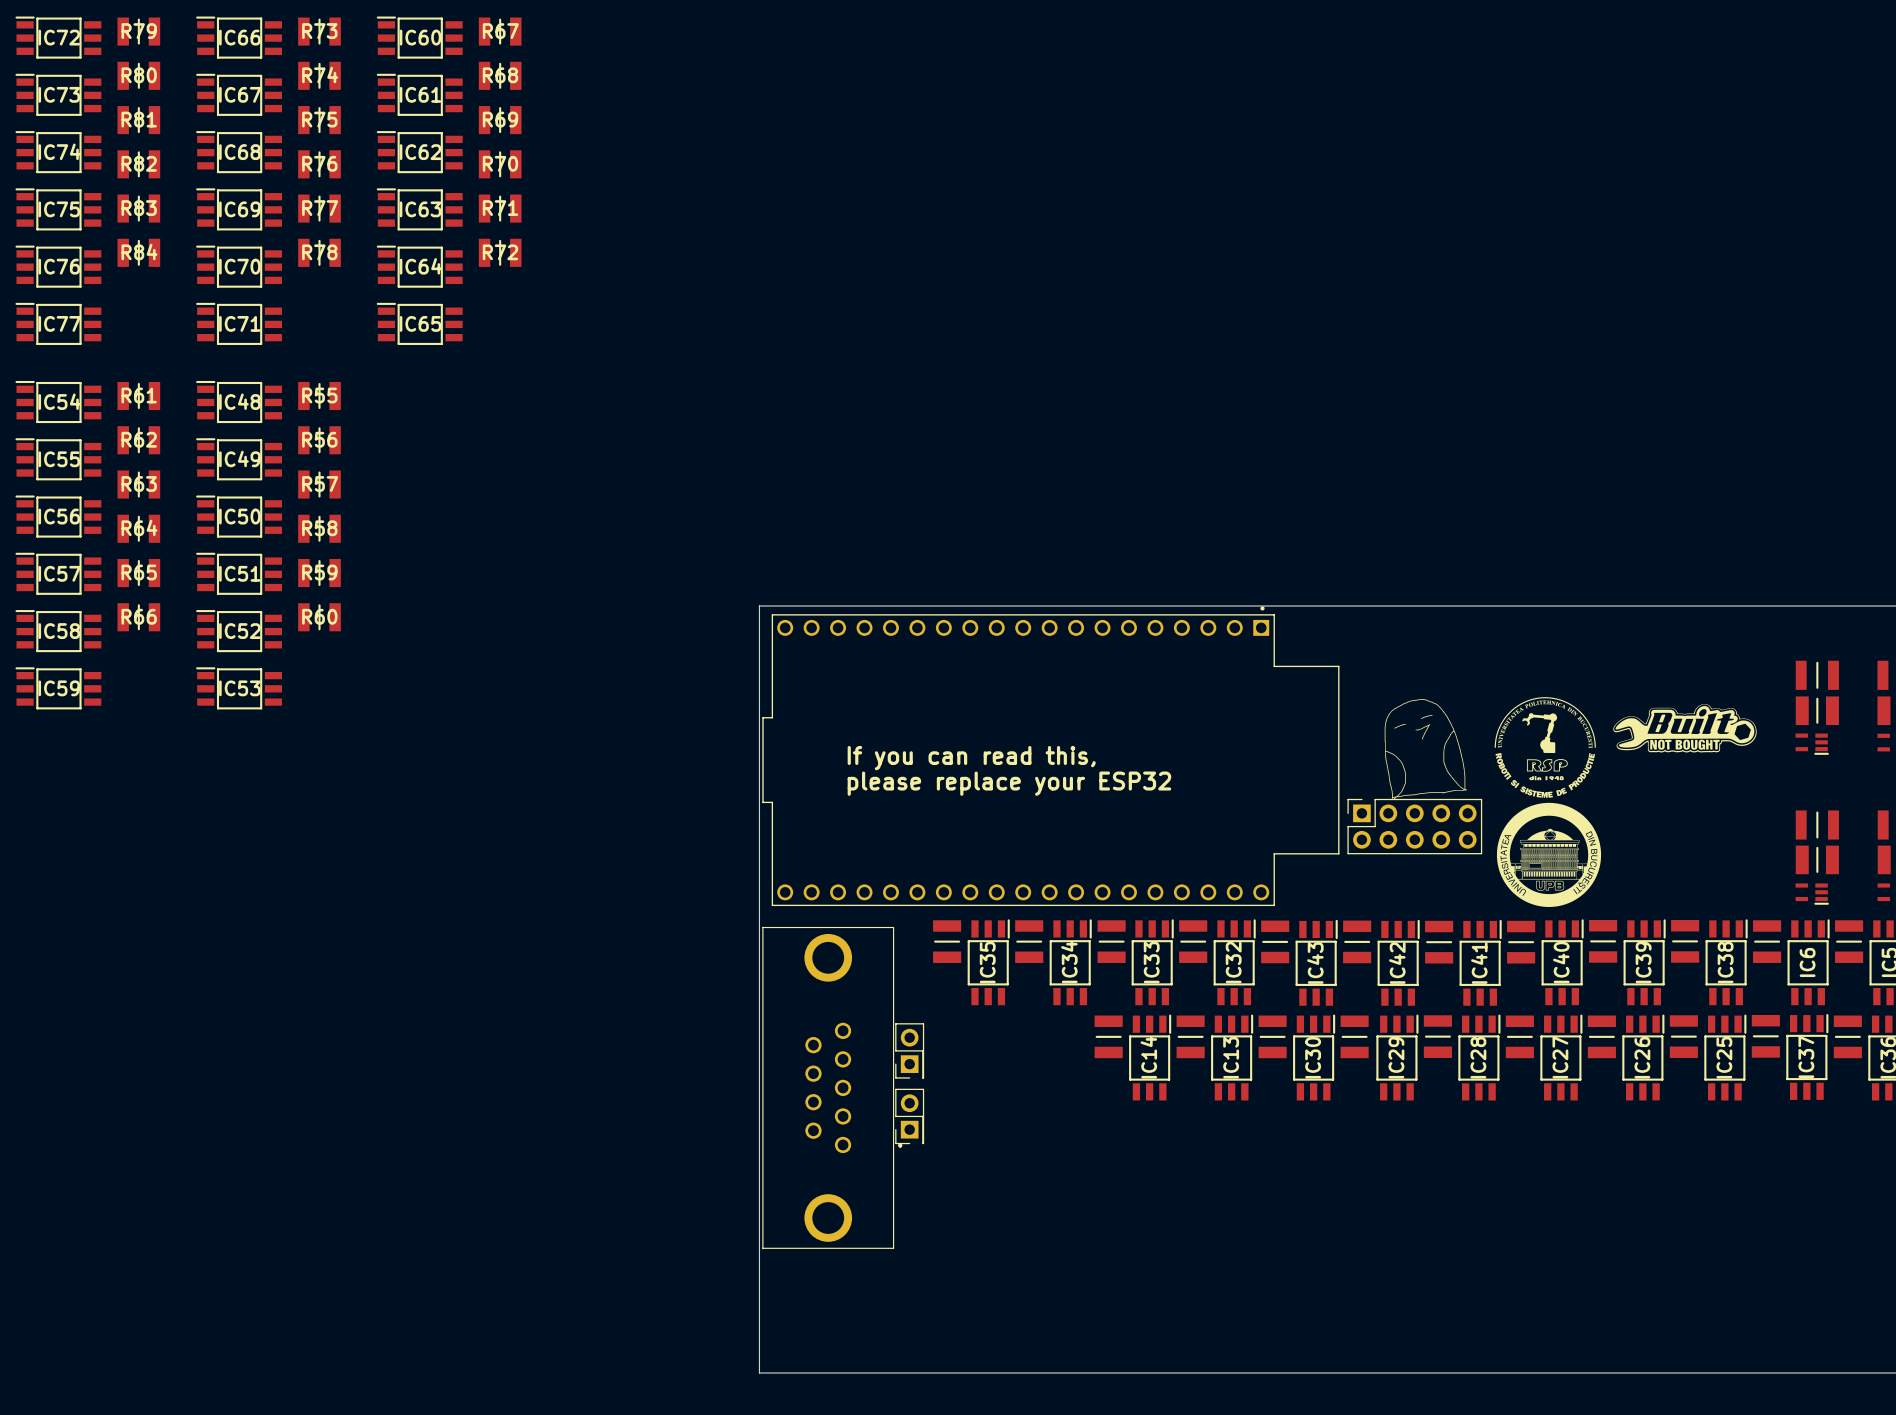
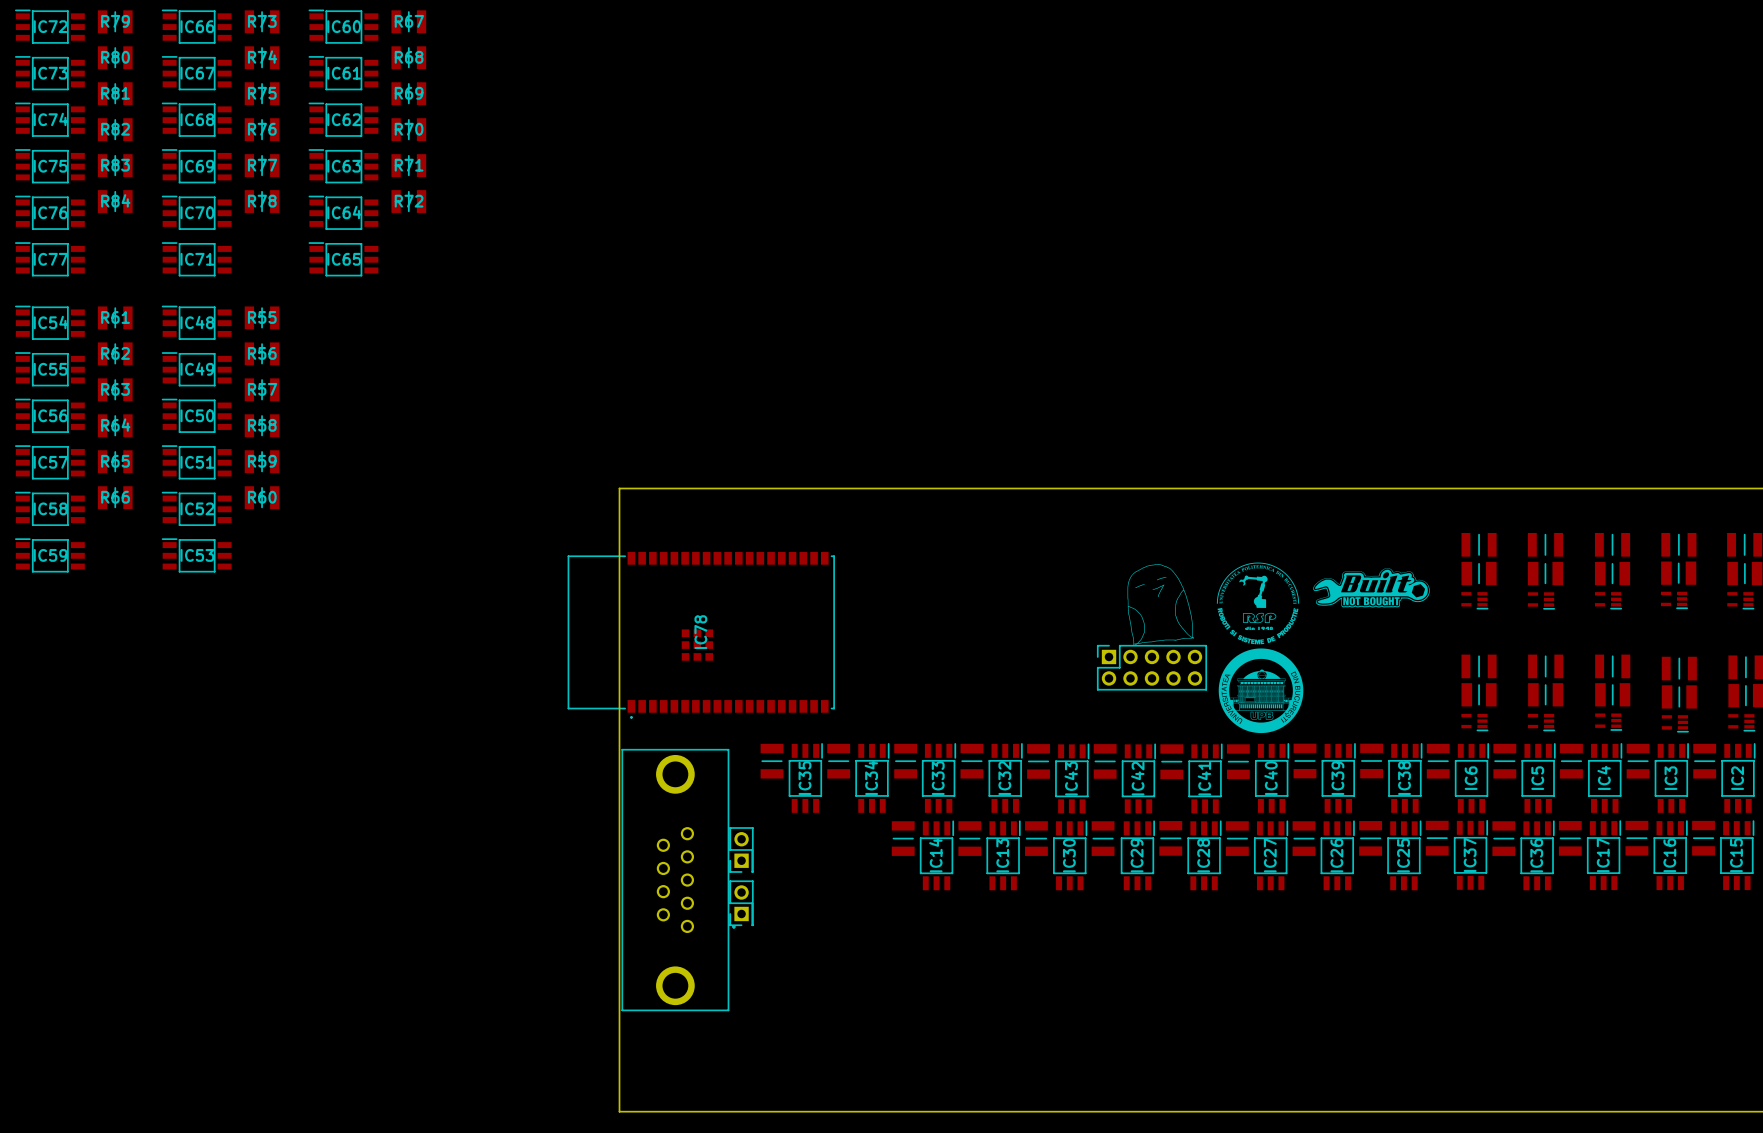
part: (1050, 756) -> none
text: If you can read this, (971, 758) -> none
text: please replace your ESP32 (1009, 783) -> none
IC78: none -> (701, 635)

